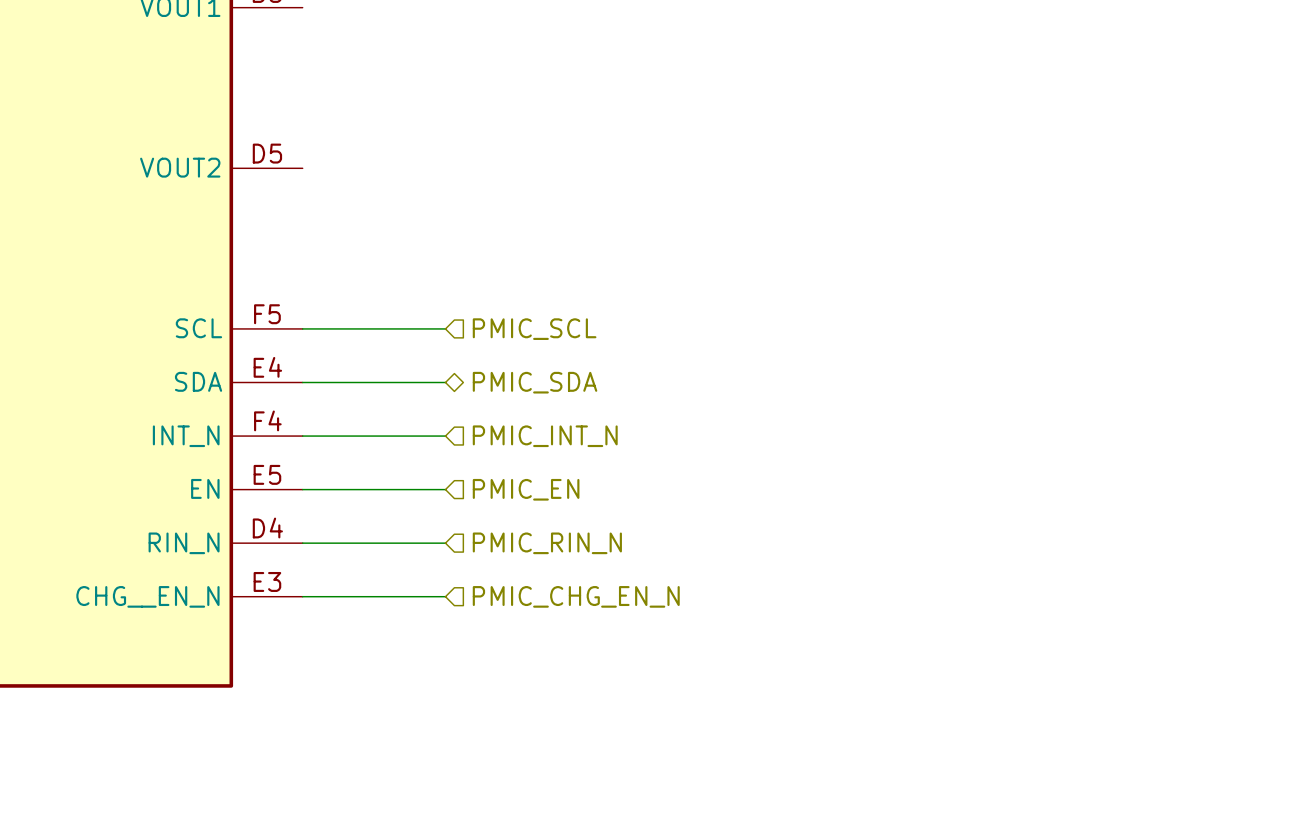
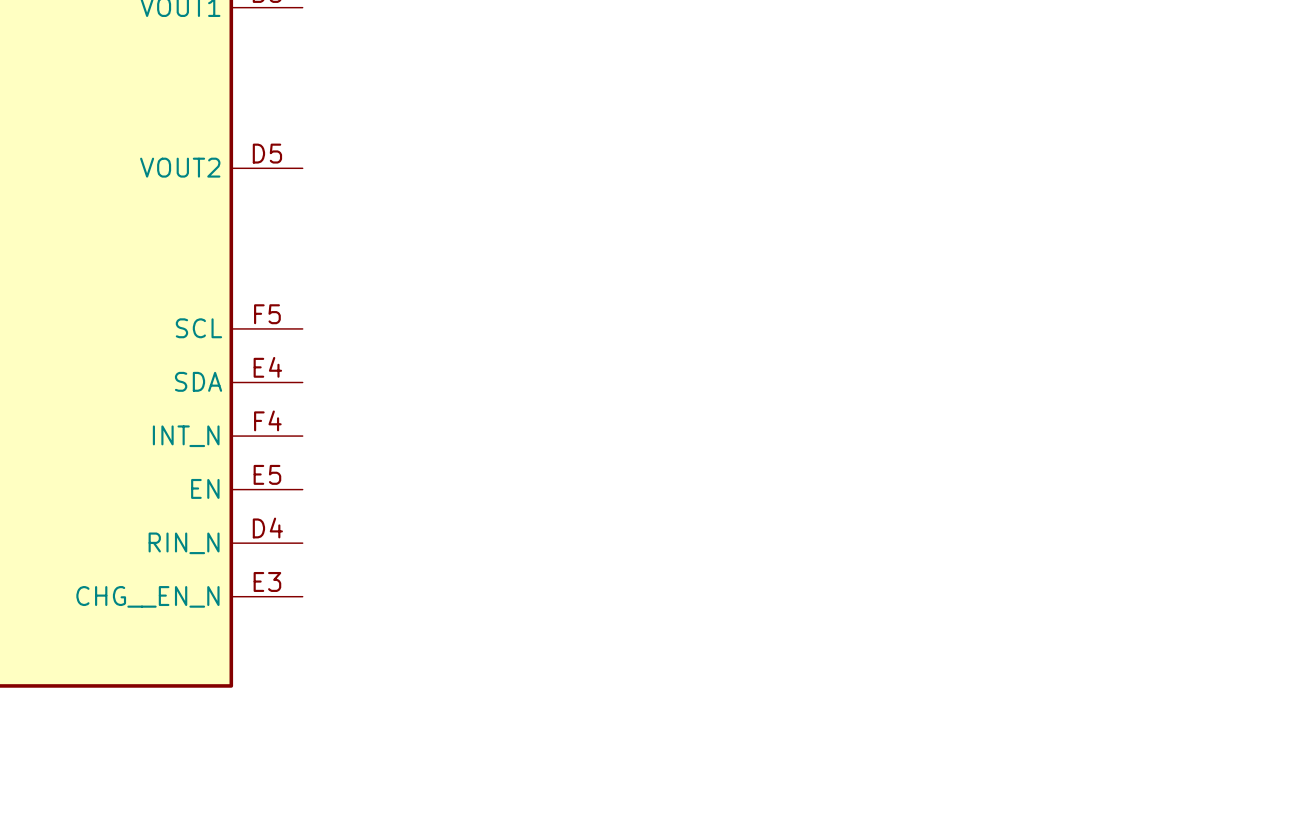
wire: (302, 328) (445, 328) -> none
hierarchical label: PMIC_SCL (534, 329) -> none
wire: (302, 382) (445, 382) -> none
hierarchical label: PMIC_SDA (535, 382) -> none
wire: (302, 436) (445, 436) -> none
hierarchical label: PMIC_INT_N (545, 436) -> none
wire: (302, 489) (445, 489) -> none
hierarchical label: PMIC_EN (526, 489) -> none
wire: (302, 543) (445, 543) -> none
hierarchical label: PMIC_RIN_N (547, 543) -> none
wire: (302, 596) (445, 596) -> none
hierarchical label: PMIC_CHG_EN_N (576, 596) -> none

